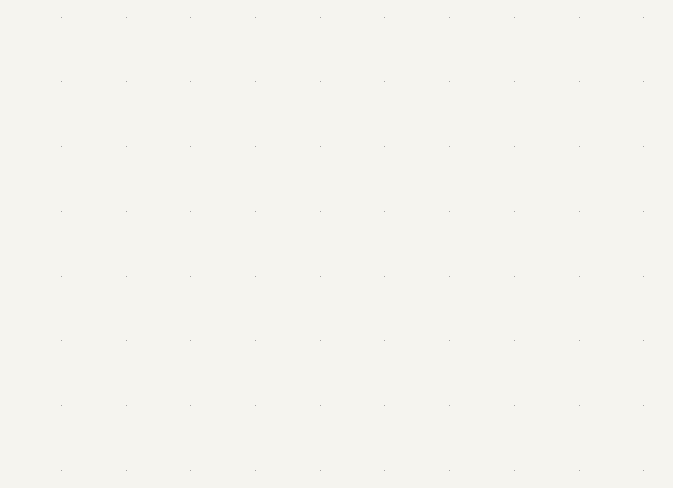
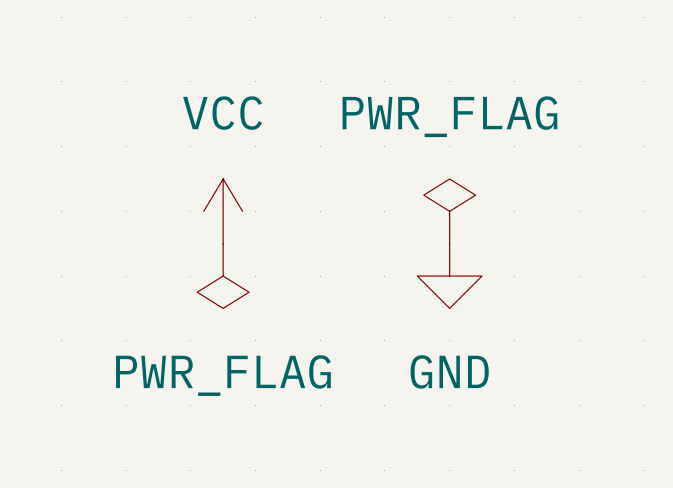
power symbol: none -> VCC (223, 211)
power symbol: none -> PWR_FLAG (449, 211)
power symbol: none -> PWR_FLAG (223, 276)
power symbol: none -> GND (449, 276)

